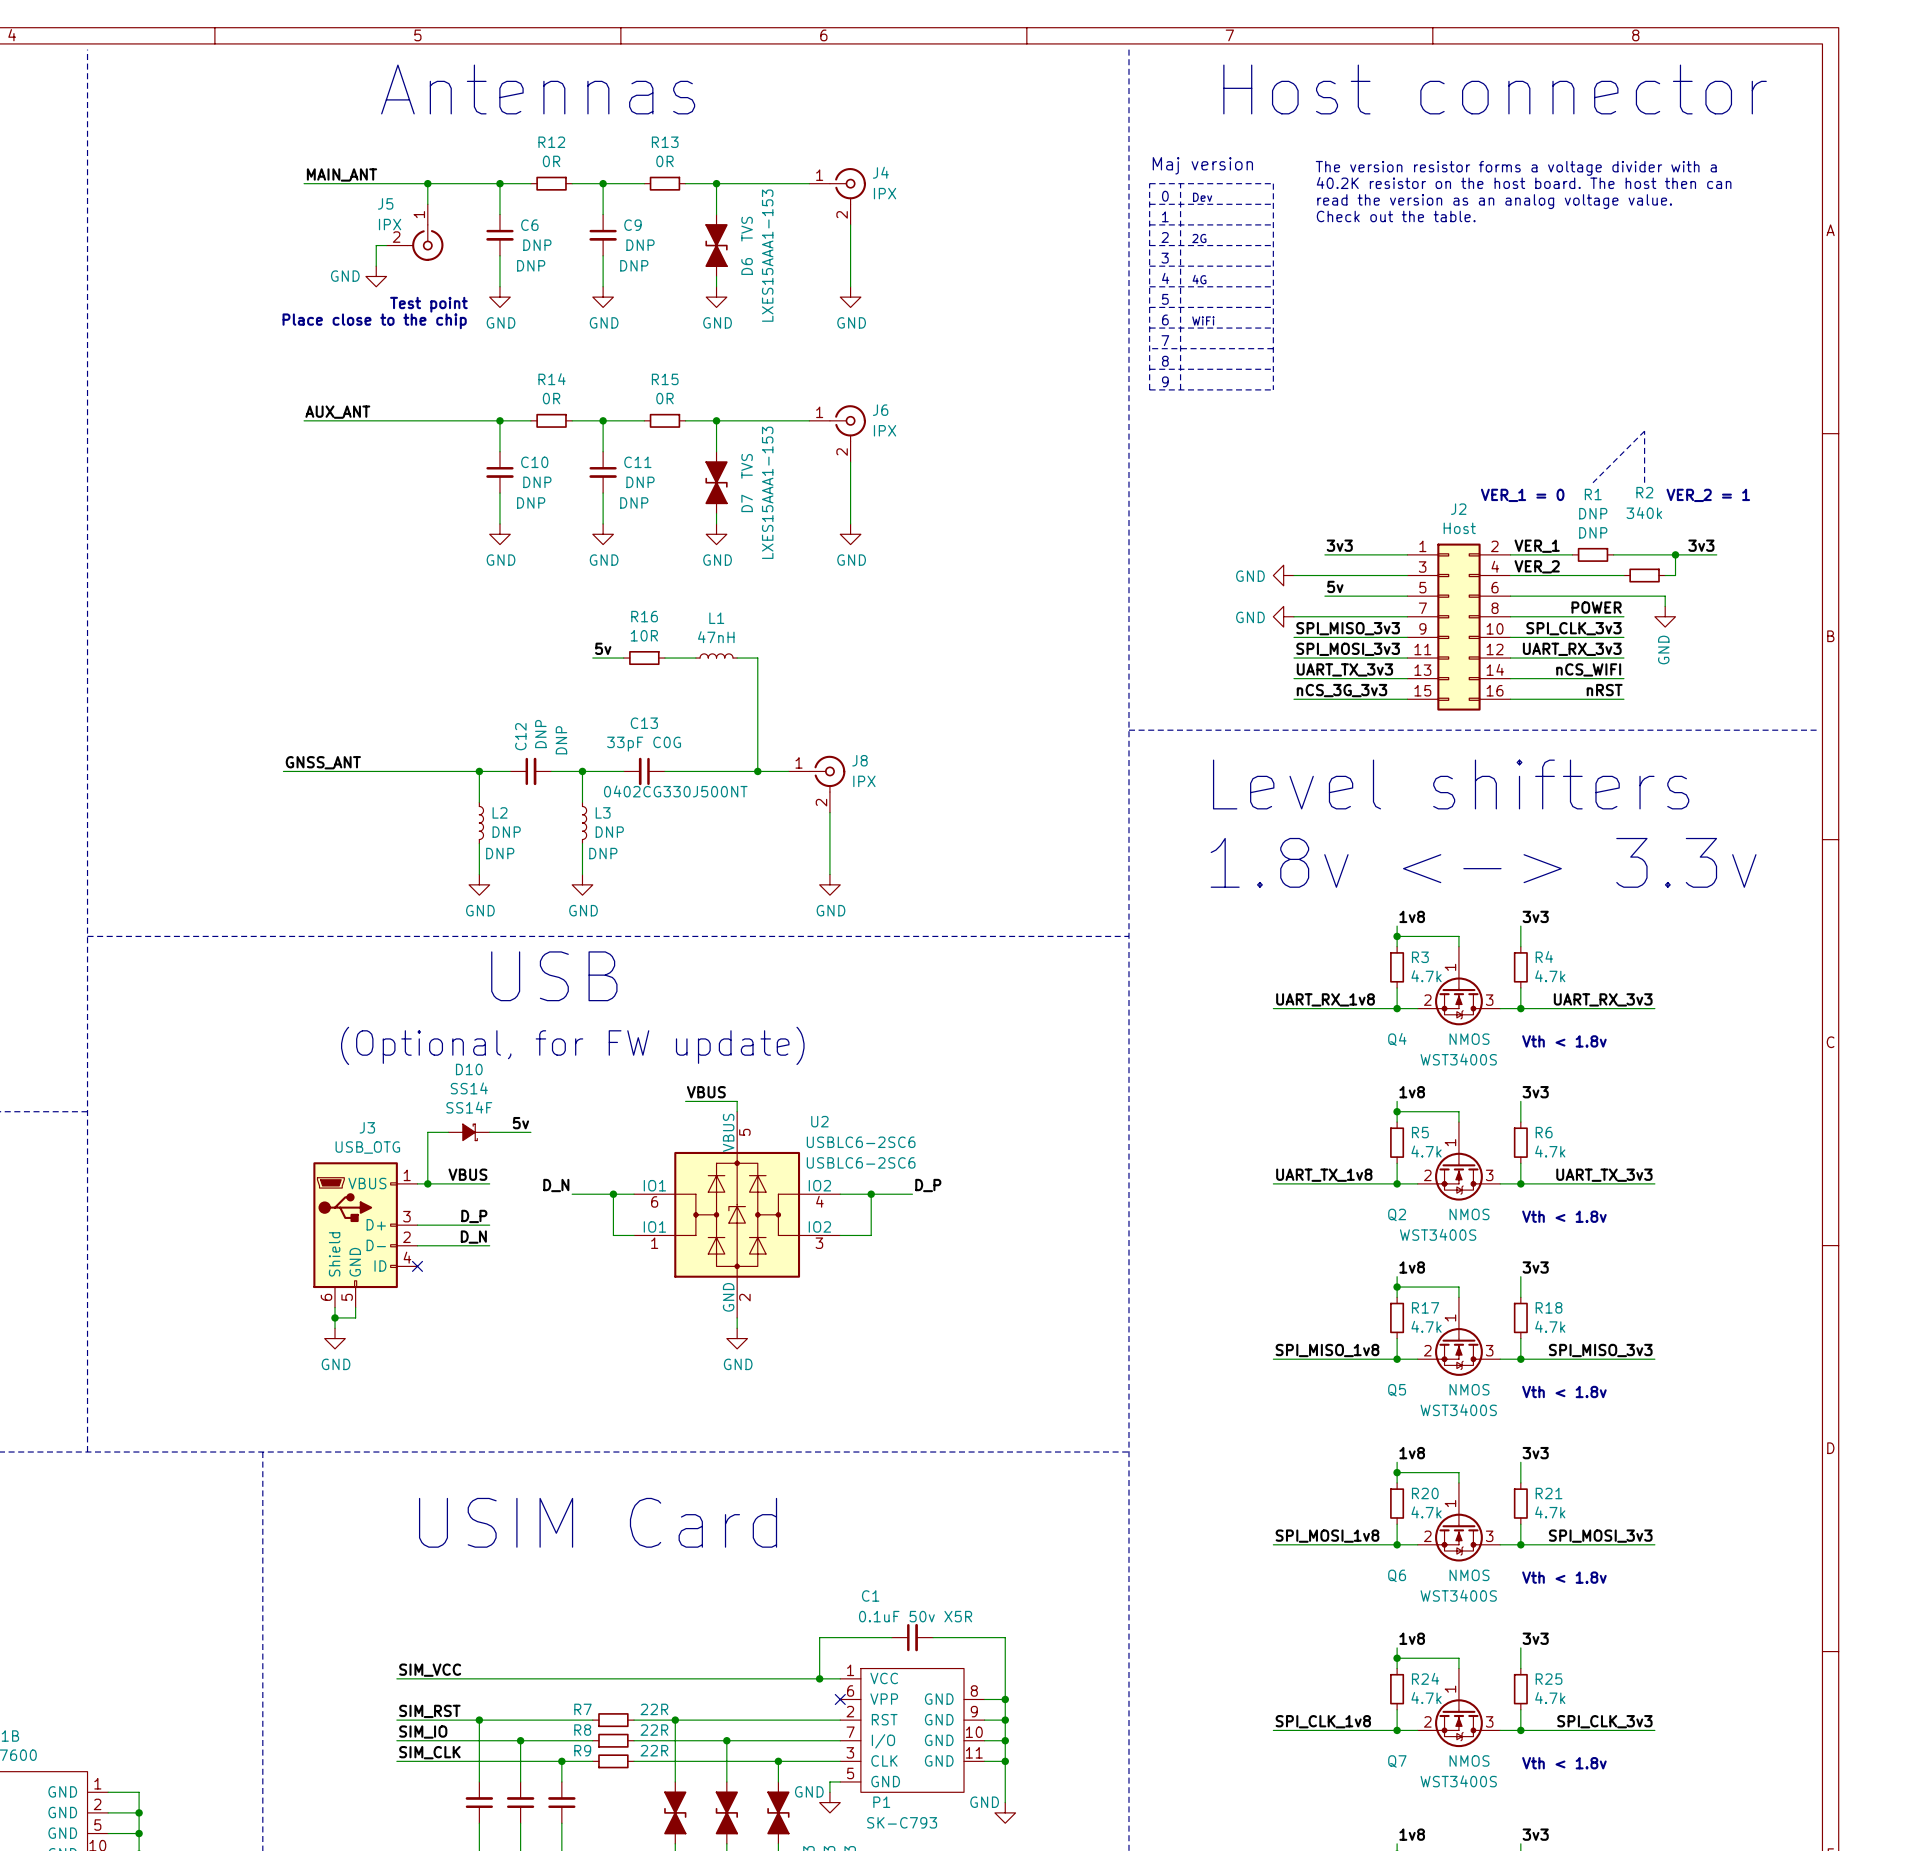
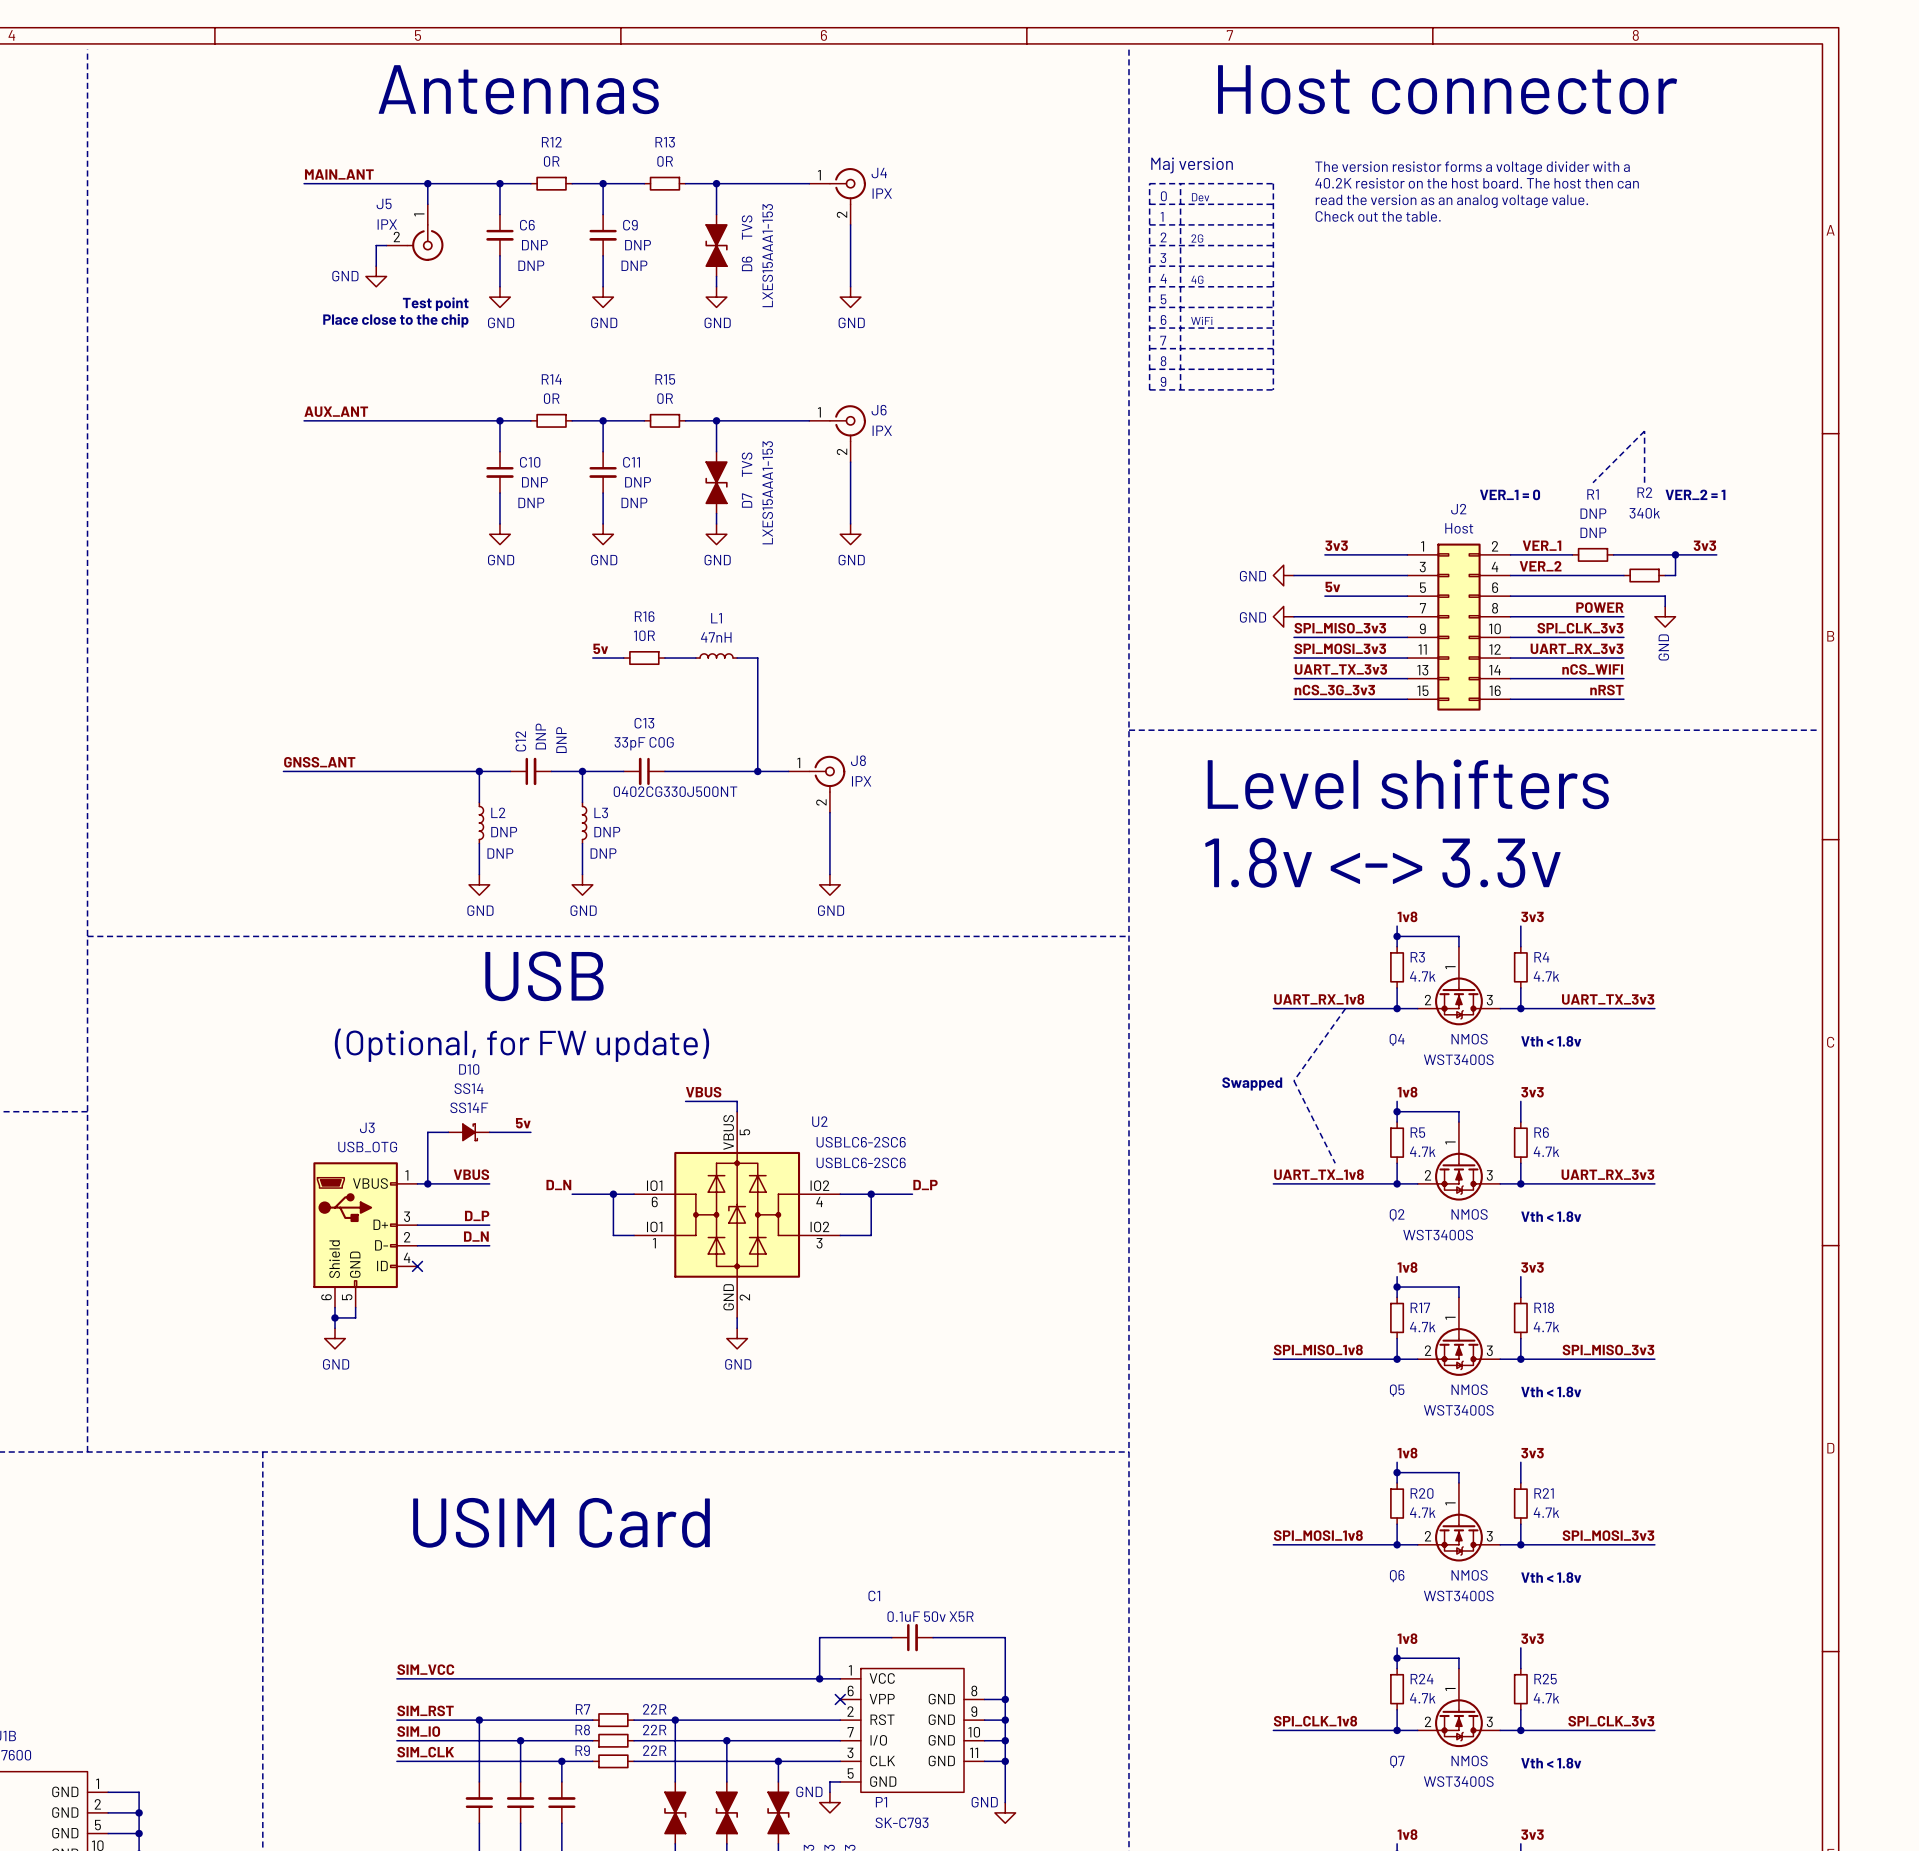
label: UART_RX_3v3 (1603, 999) -> UART_TX_3v3 (1608, 999)
line: none -> (1345, 1008) (1293, 1080) (1335, 1163)
text: none -> Swapped (1252, 1083)
label: UART_TX_3v3 (1604, 1175) -> UART_RX_3v3 (1607, 1174)

